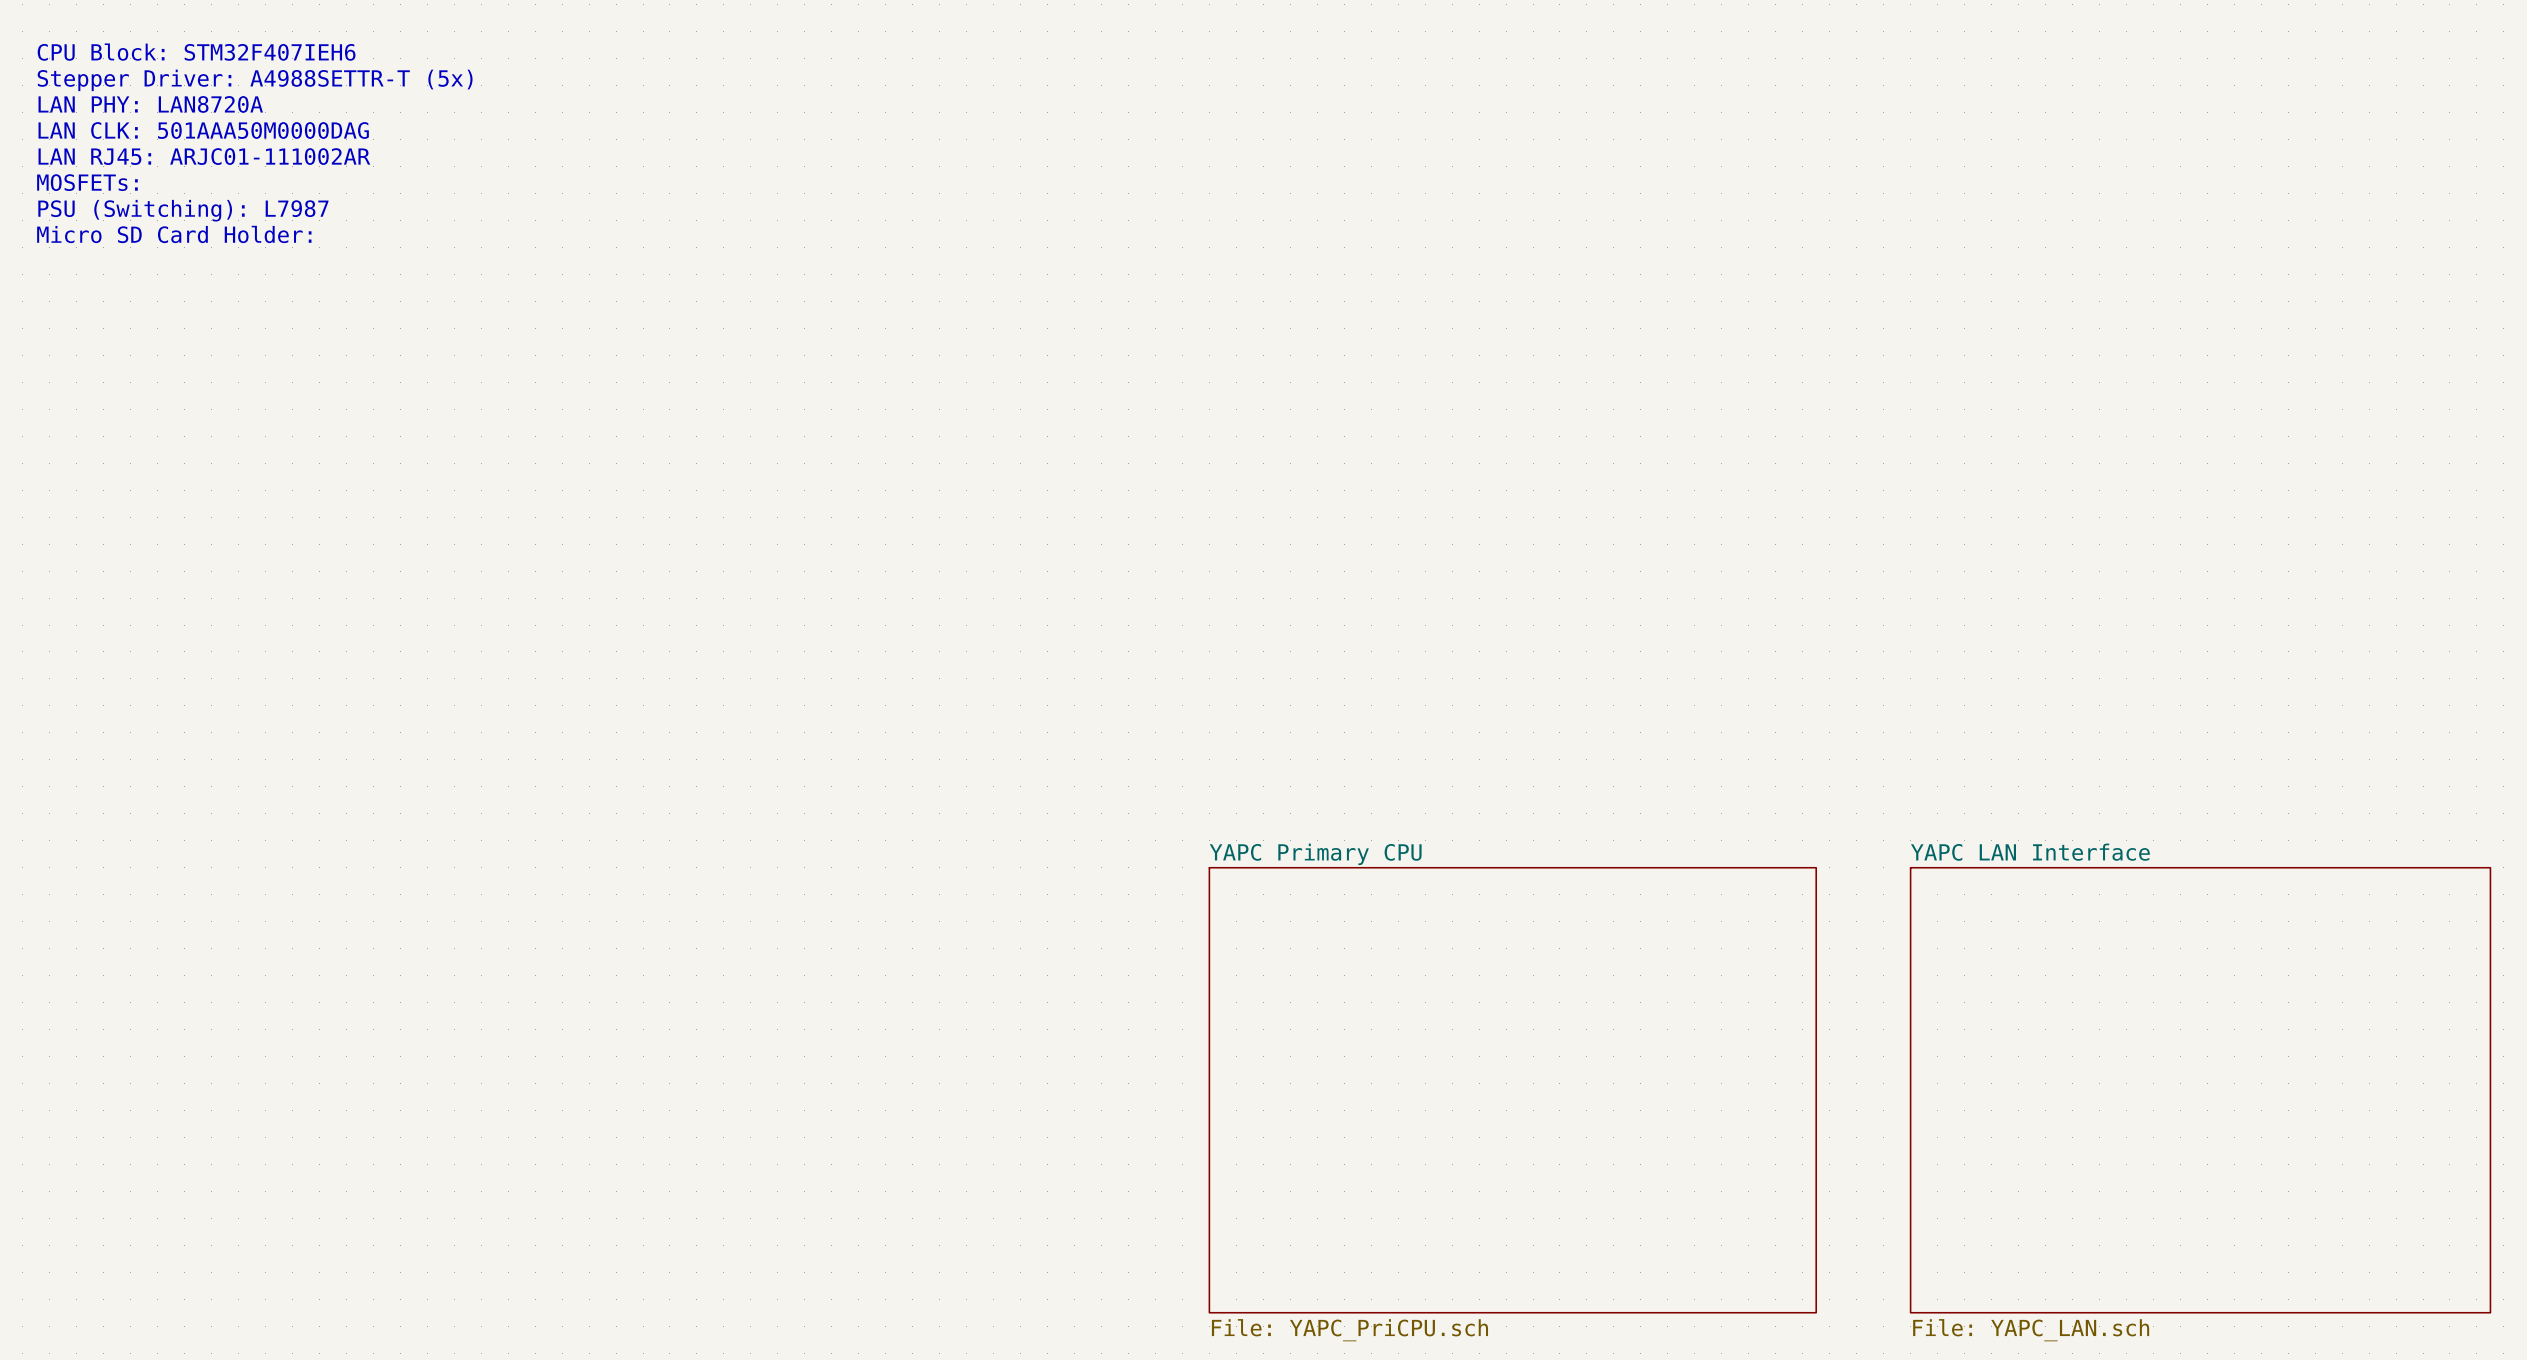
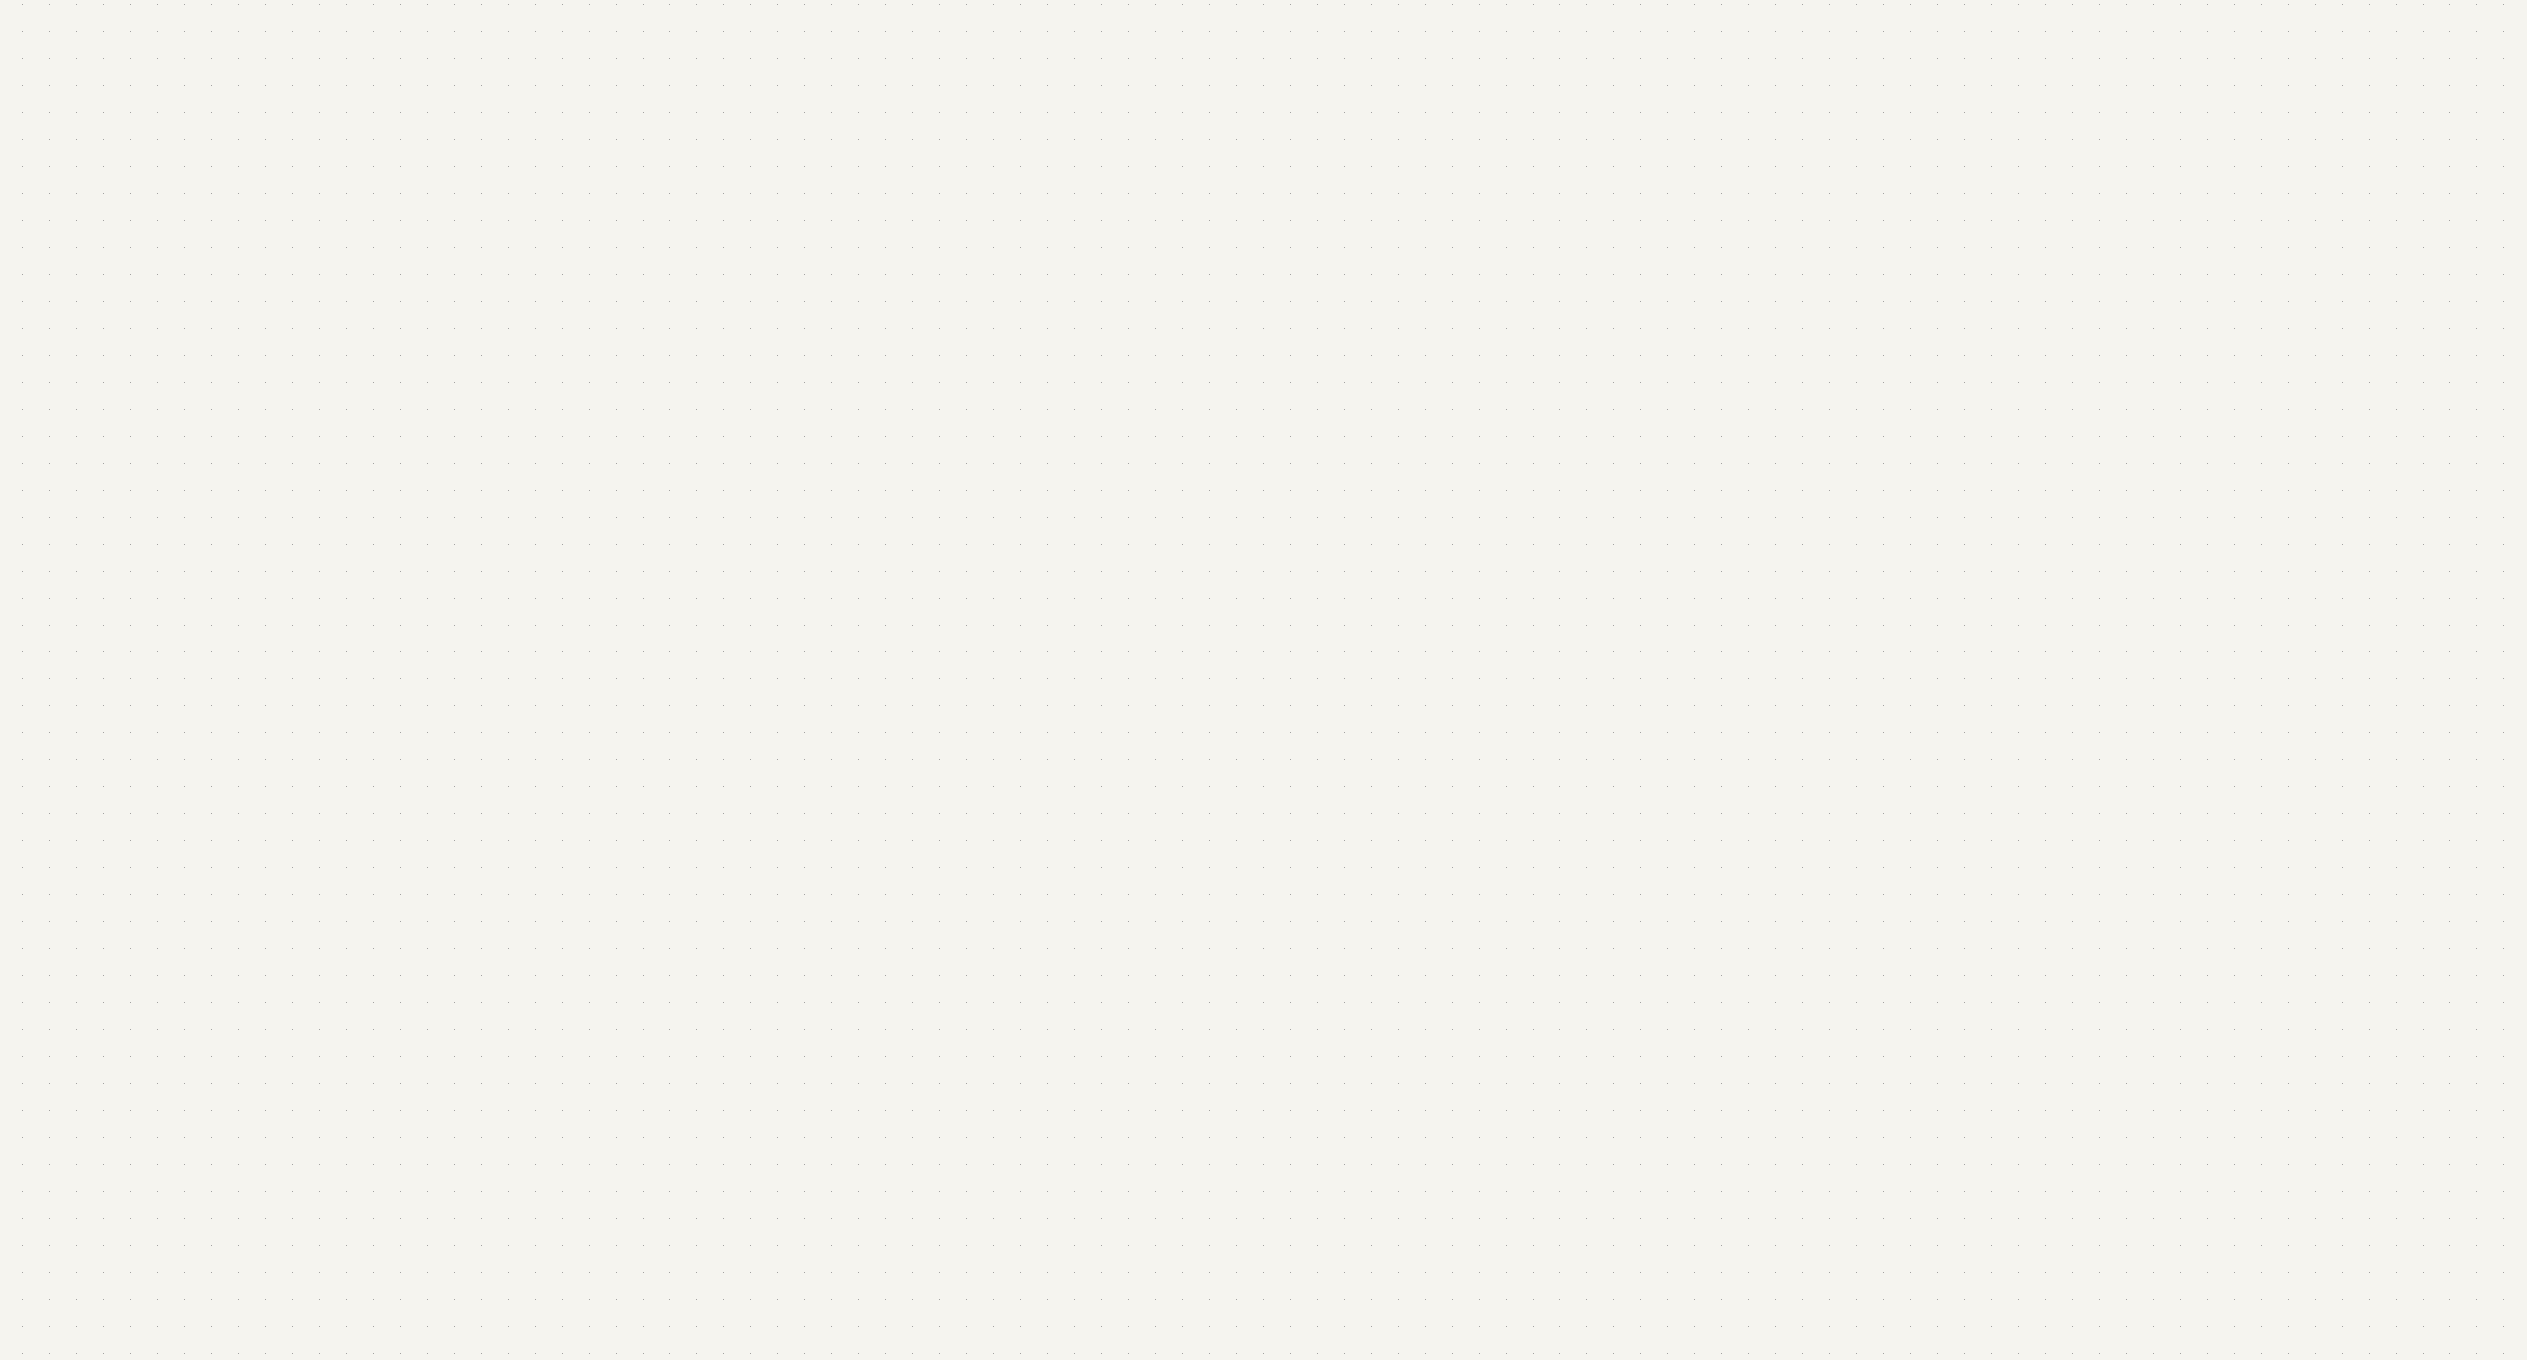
text: CPU Block: STM32F407IEH6 (196, 52) -> none
text: Stepper Driver: A4988SETTR-T (5x) (255, 80) -> none
text: LAN PHY: LAN8720A (150, 104) -> none
text: LAN CLK: 501AAA50M0000DAG (203, 130) -> none
text: LAN RJ45: ARJC01-111002AR (204, 156) -> none
text: MOSFETs: (87, 182) -> none
text: PSU (Switching): L7987 (183, 210) -> none
text: Micro SD Card Holder: (174, 234) -> none
sheet YAPC Primary CPU: File: YAPC_PriCPU.sch (1512, 1090) -> none
sheet YAPC LAN Interface: File: YAPC_LAN.sch (2200, 1090) -> none

